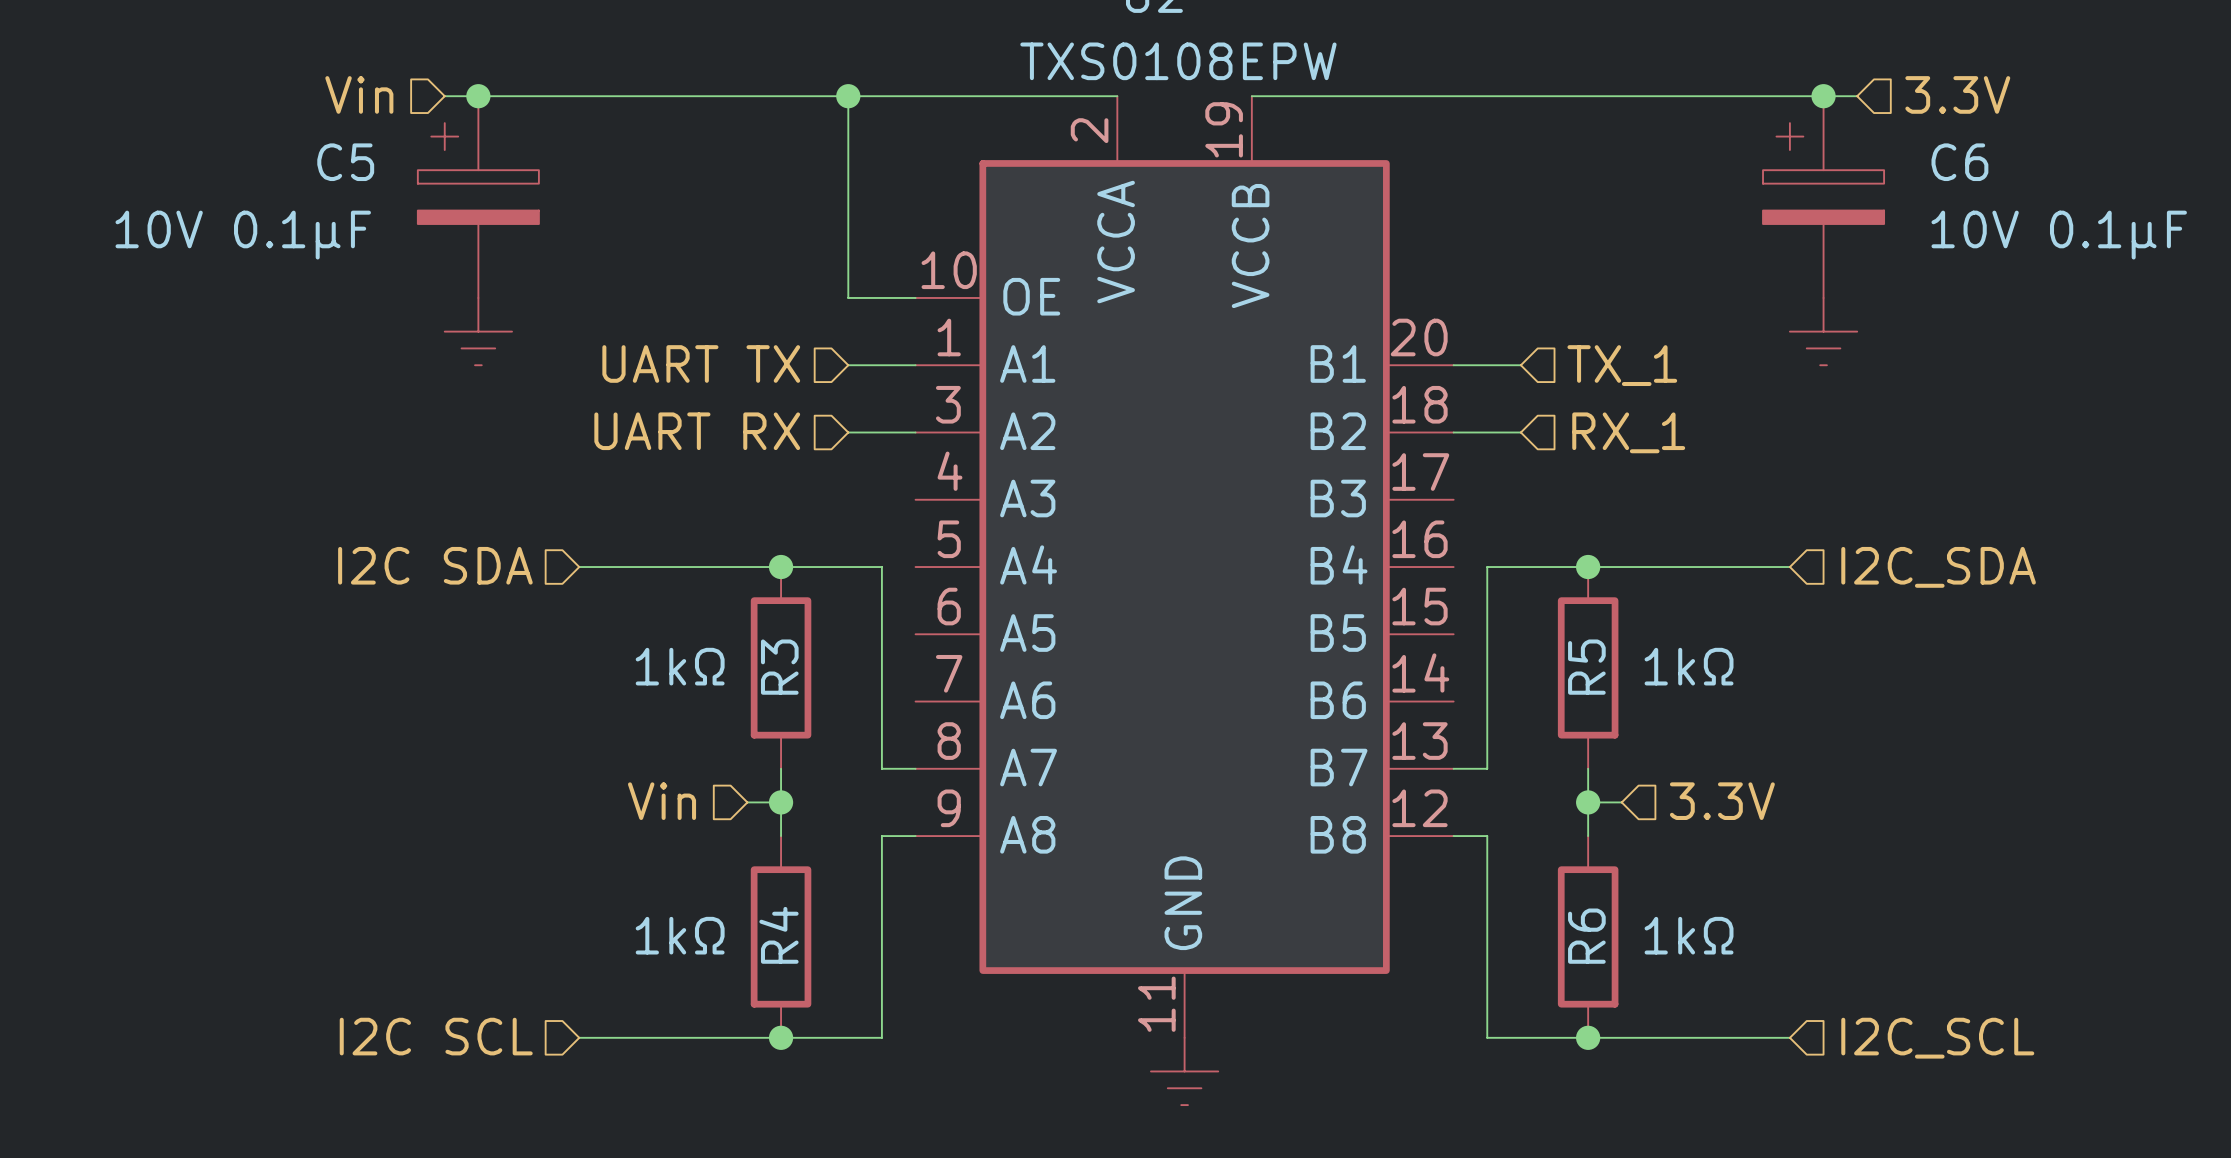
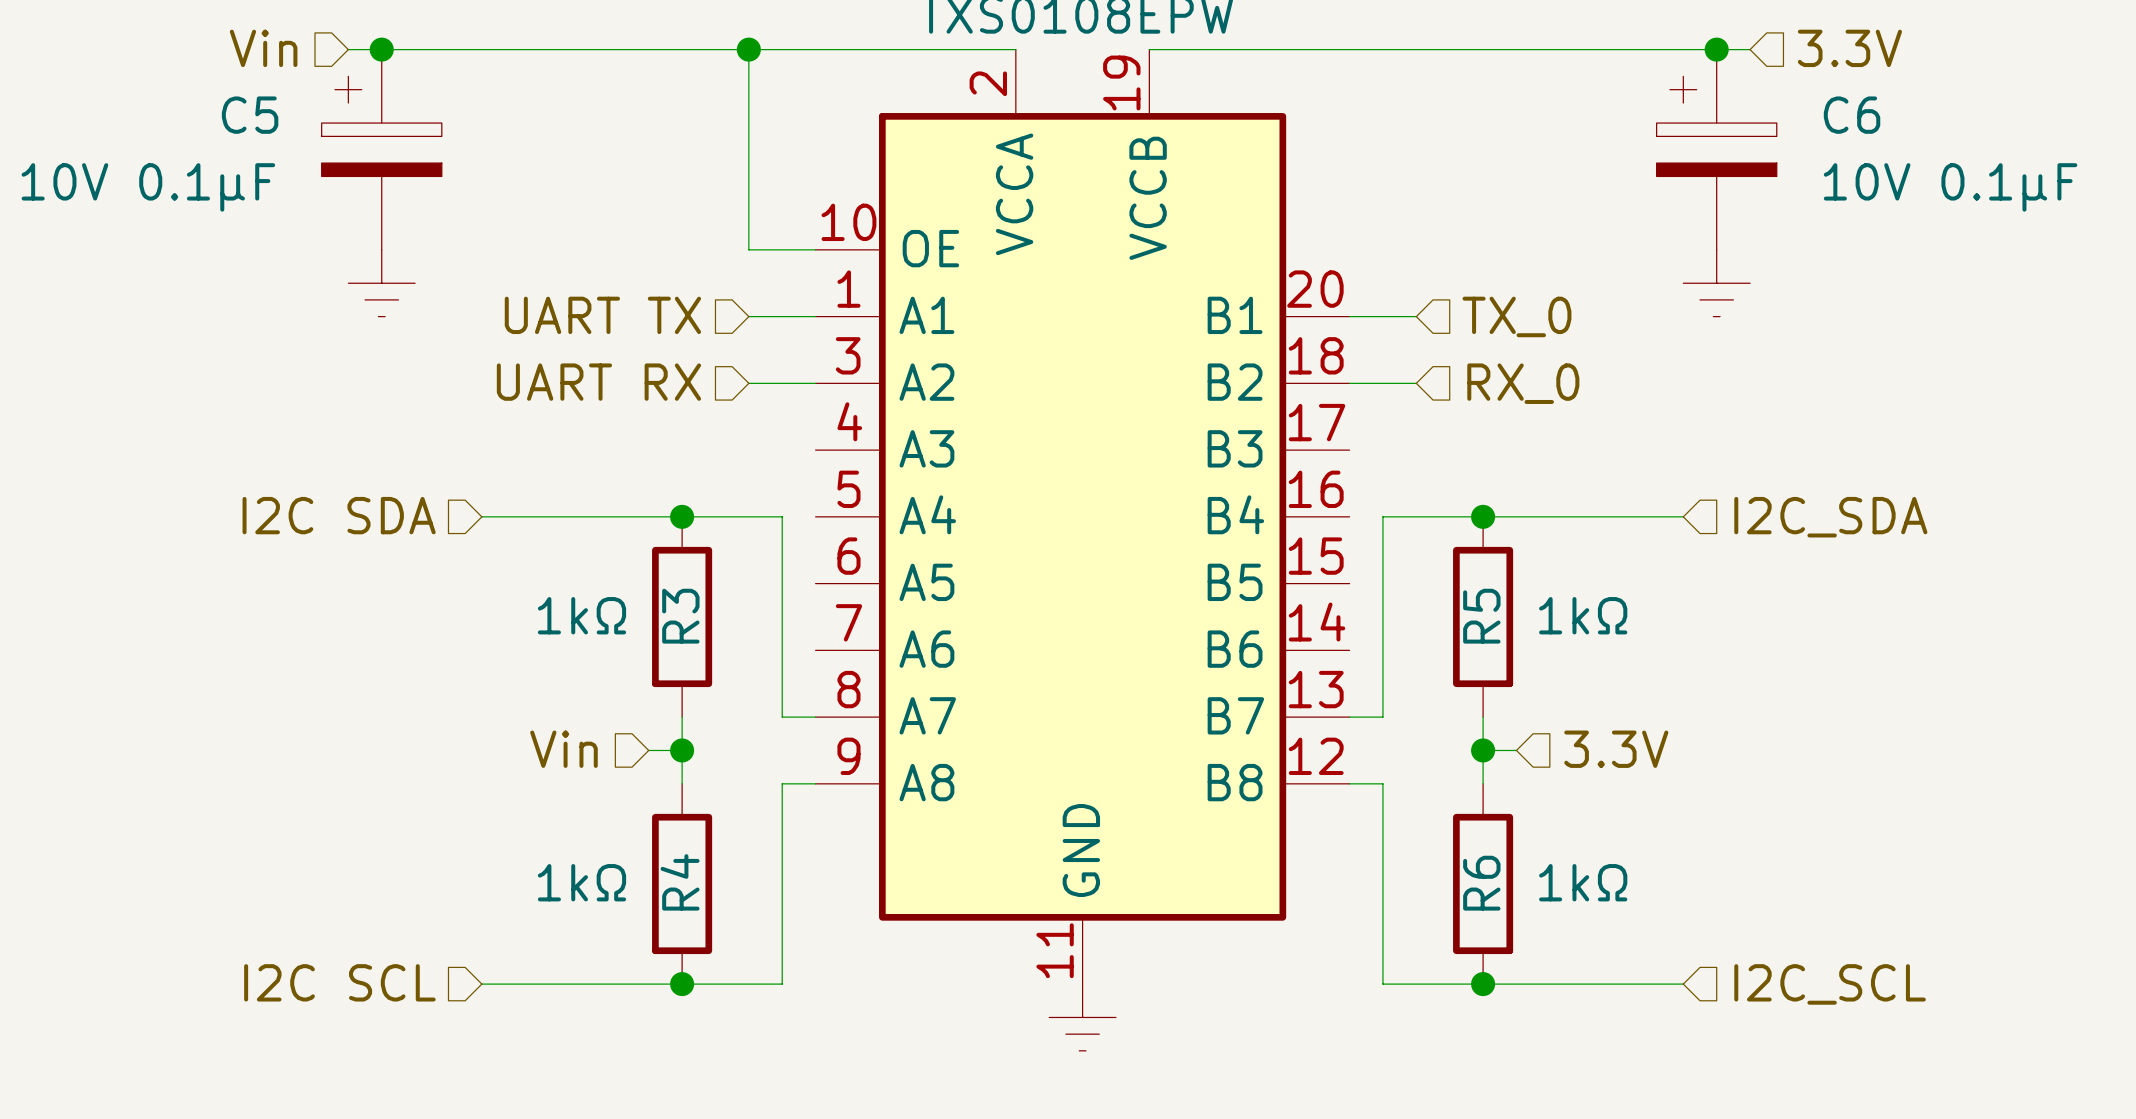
hierarchical label: TX_1 (1622, 365) -> TX_0 (1516, 316)
hierarchical label: RX_1 (1628, 432) -> RX_0 (1523, 383)

